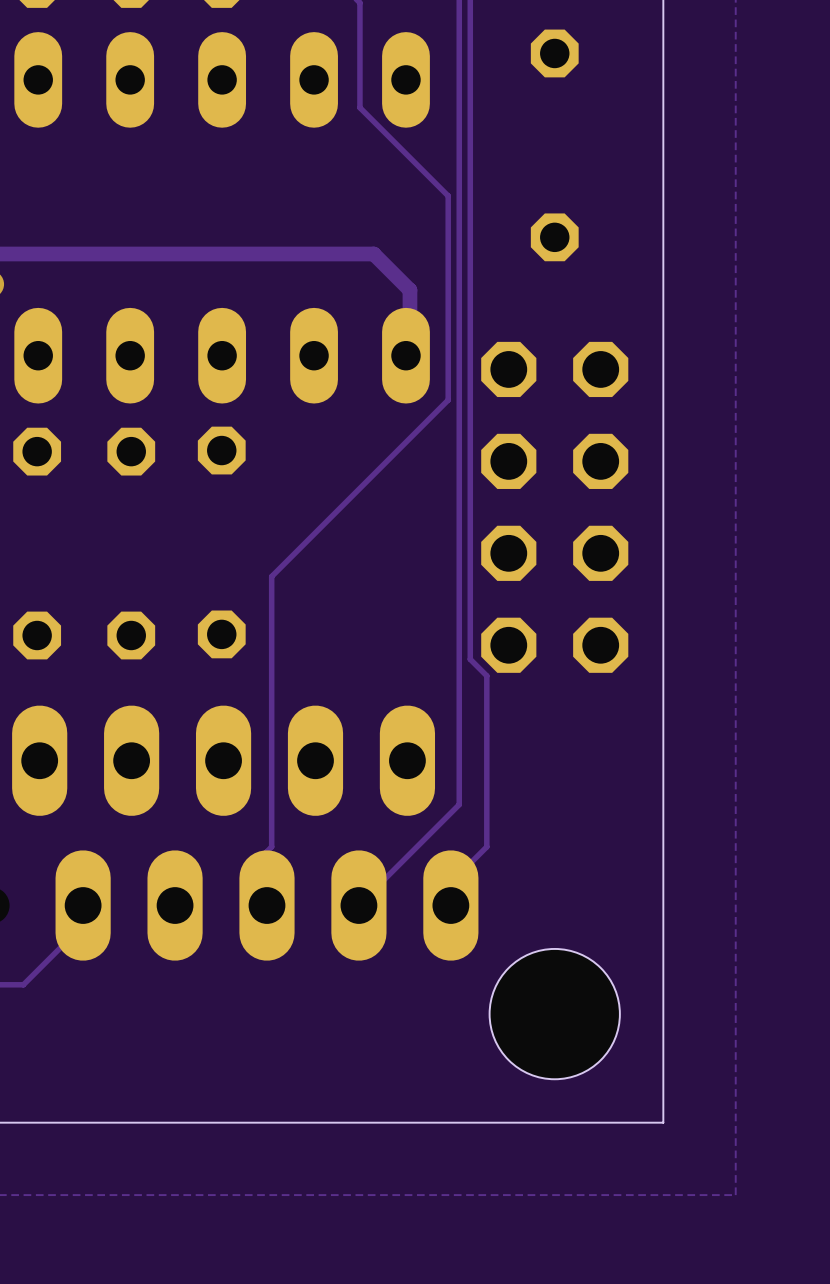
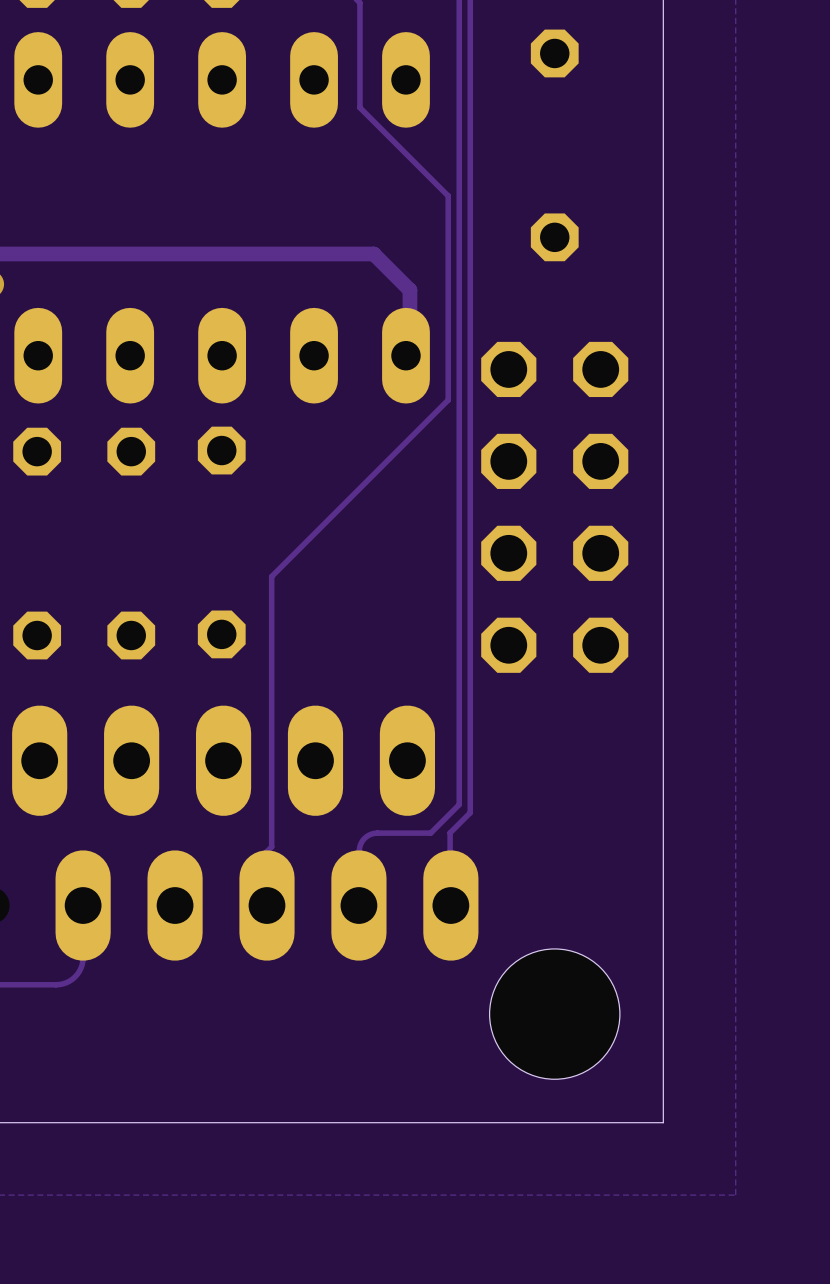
track: (470, 659) (486, 675) (486, 846) (453, 879) (453, 902) (450, 905) -> (470, 659) (470, 812) (450, 832) (450, 905)
track: (430, 833) (358, 905) -> (430, 833) (375, 833) (364, 838) (359, 848) (358, 905)
track: (83, 905) (78, 907) (78, 929) (23, 984) -> (83, 905) (82, 961) (77, 974) (69, 981) (59, 984) (23, 984)

